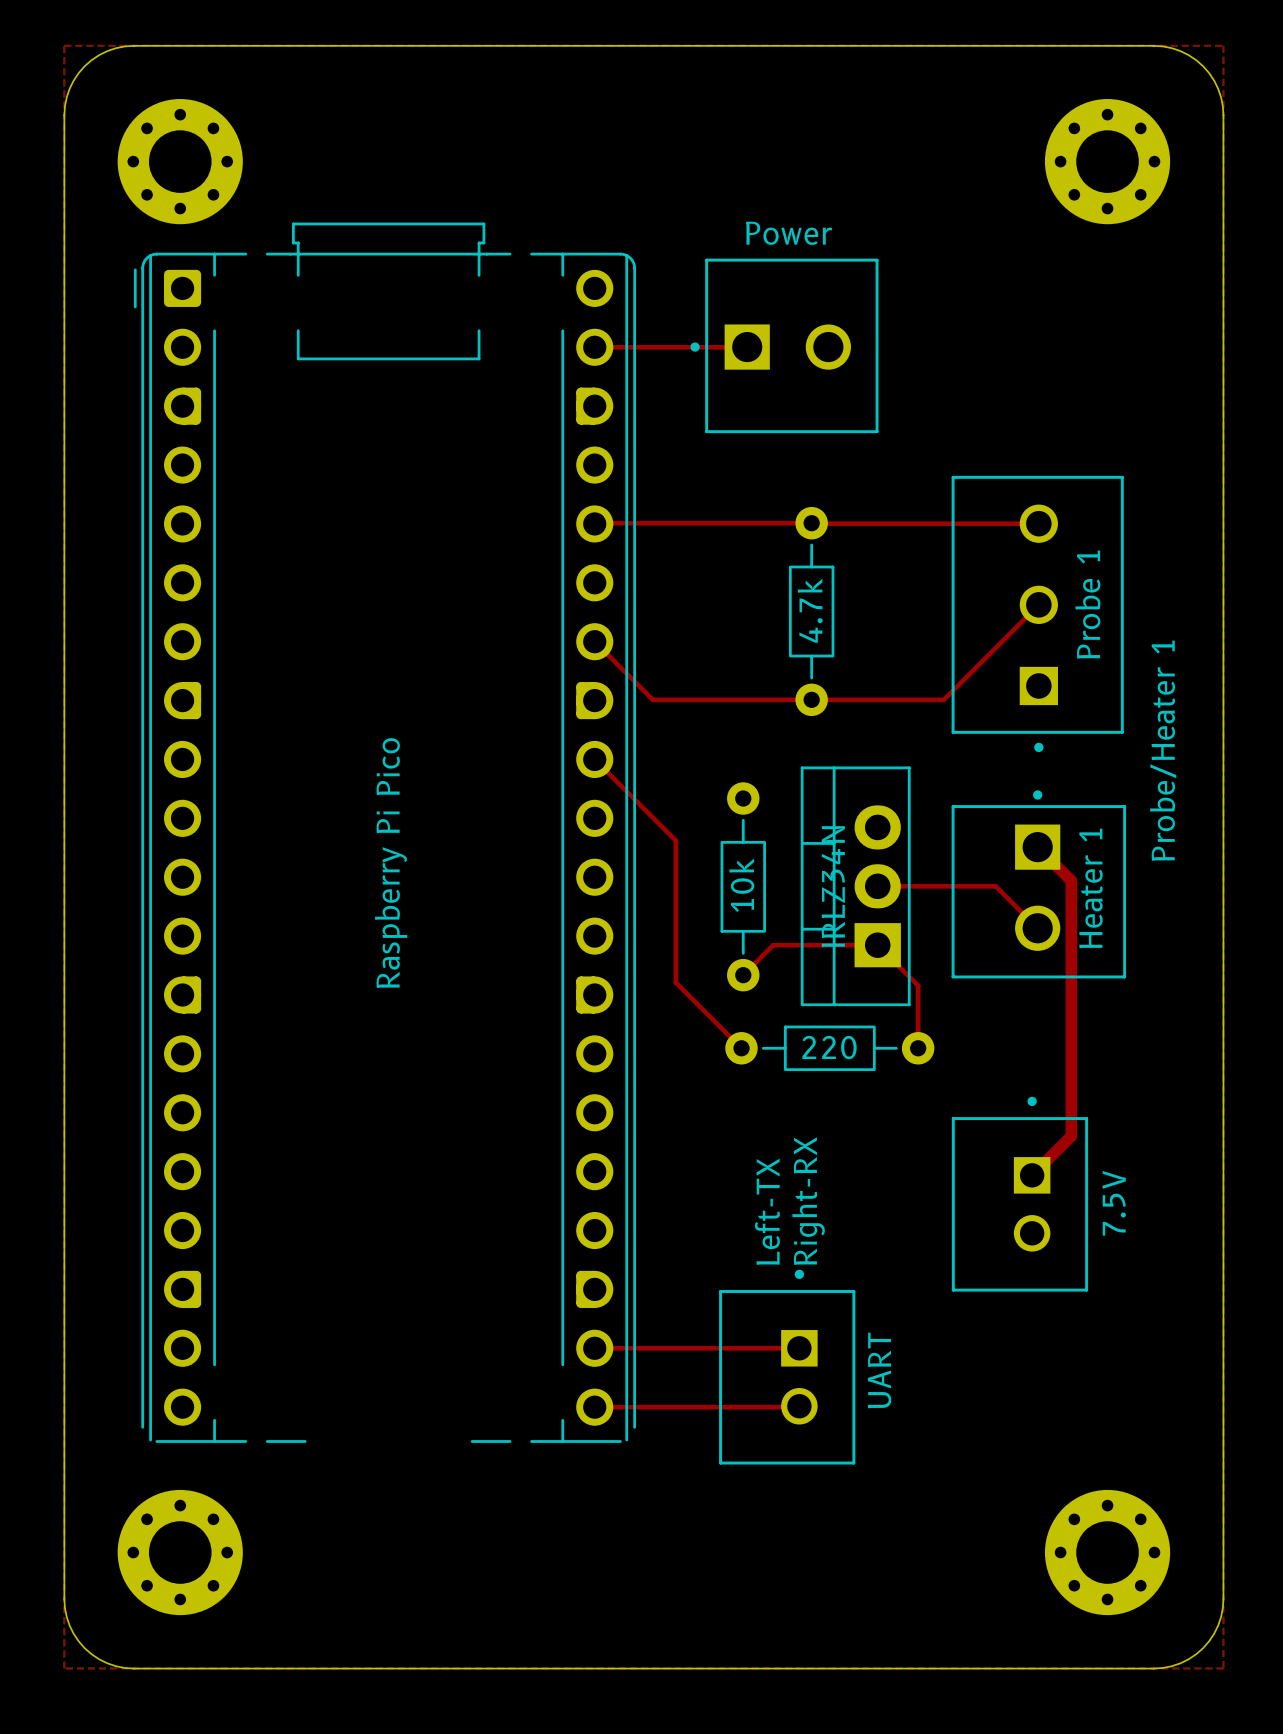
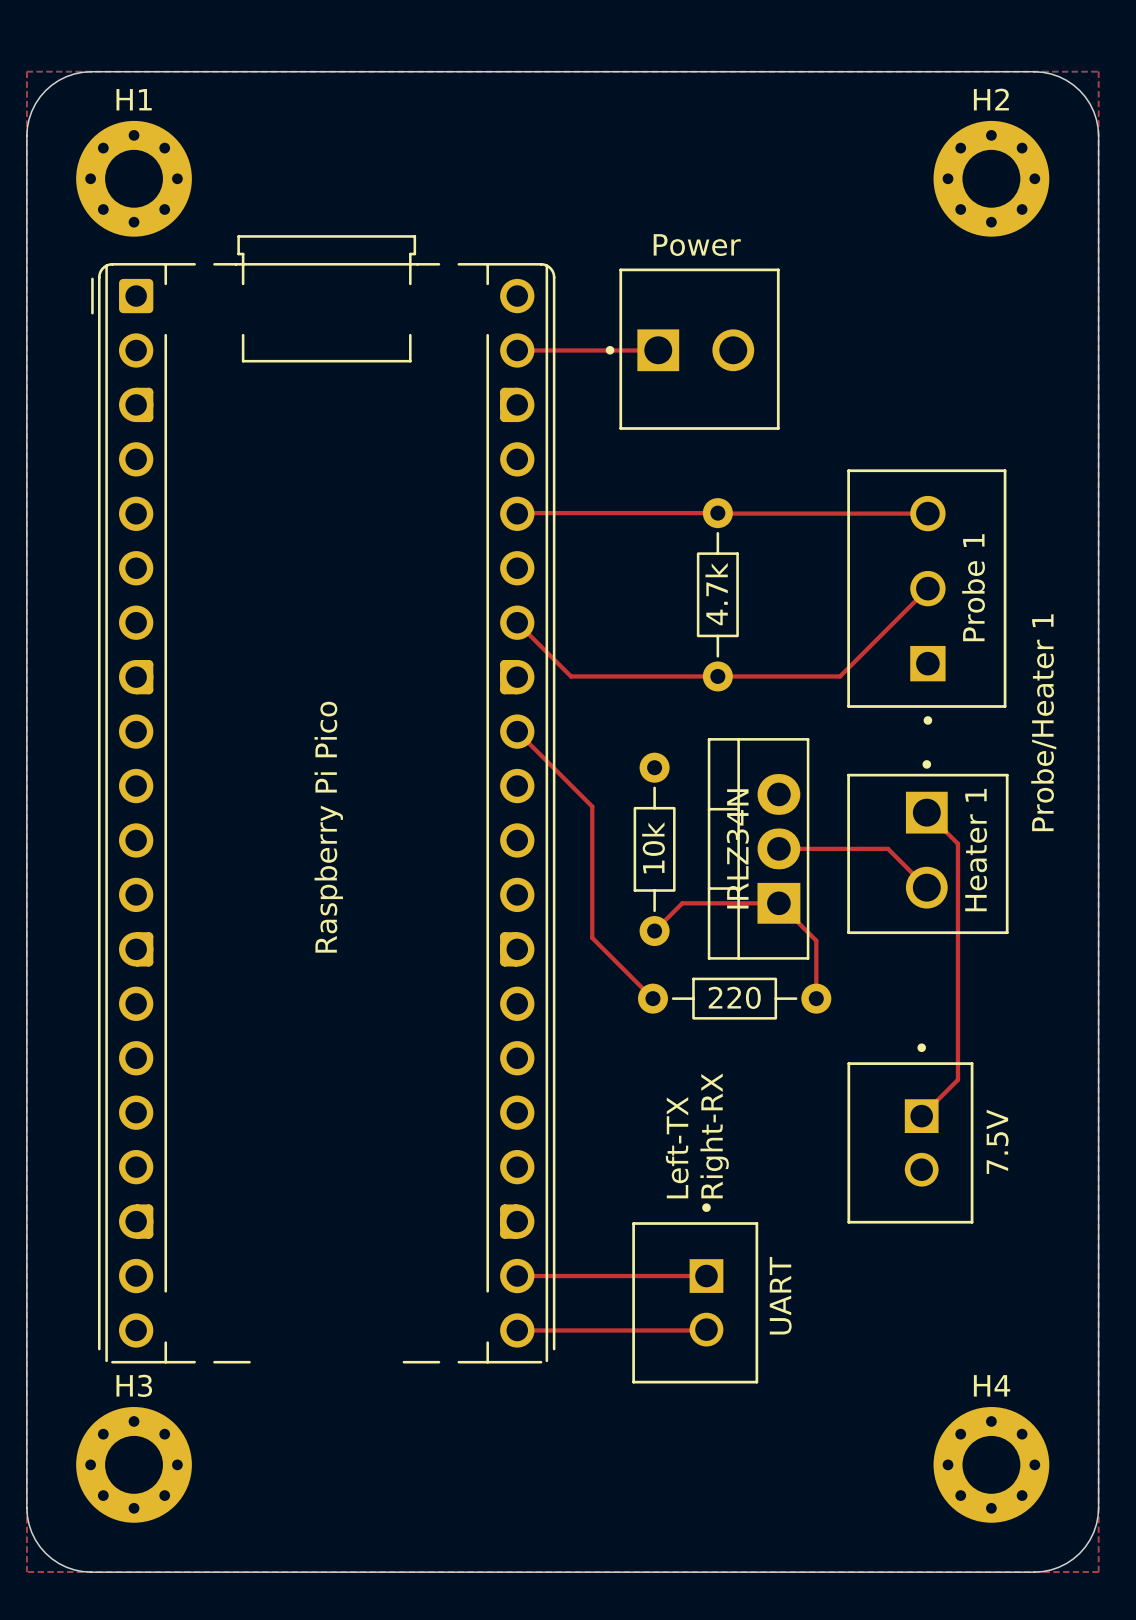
H1 name: none -> H1 (134, 99)
H2 name: none -> H2 (991, 99)
top track width: thick (1037, 847) (1071, 880) (1071, 1136) (1032, 1175) -> thin (926, 812) (957, 843) (957, 1079) (921, 1116)
H3 name: none -> H3 (134, 1385)
H4 name: none -> H4 (992, 1385)

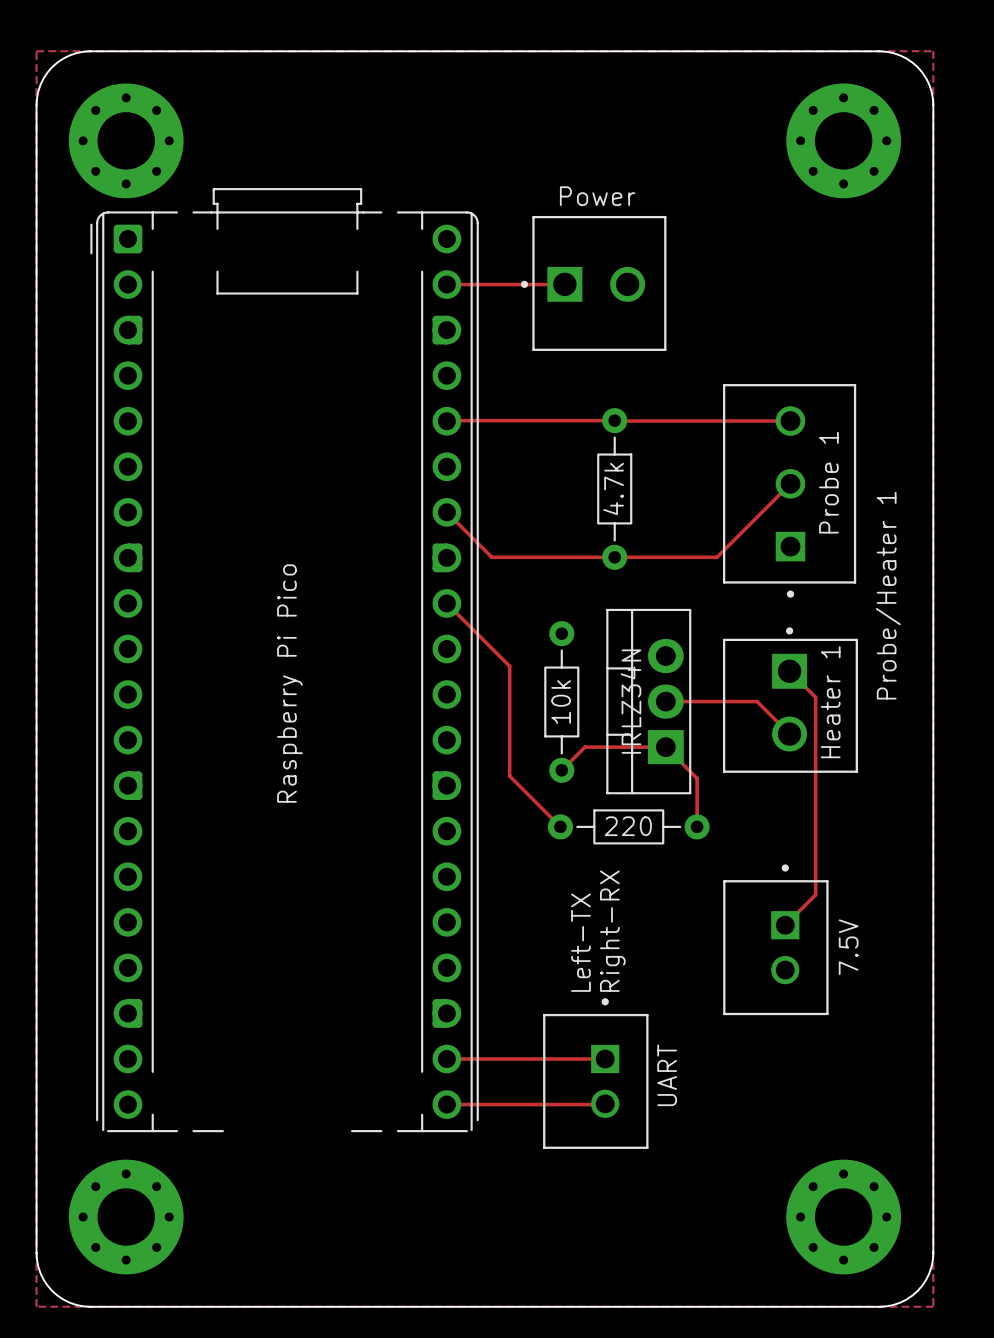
H1: (134, 178) -> none
part: none -> (126, 140)
H2: (991, 178) -> none
part: none -> (843, 140)
H3: (134, 1464) -> none
part: none -> (126, 1217)
H4: (991, 1464) -> none
part: none -> (843, 1217)

